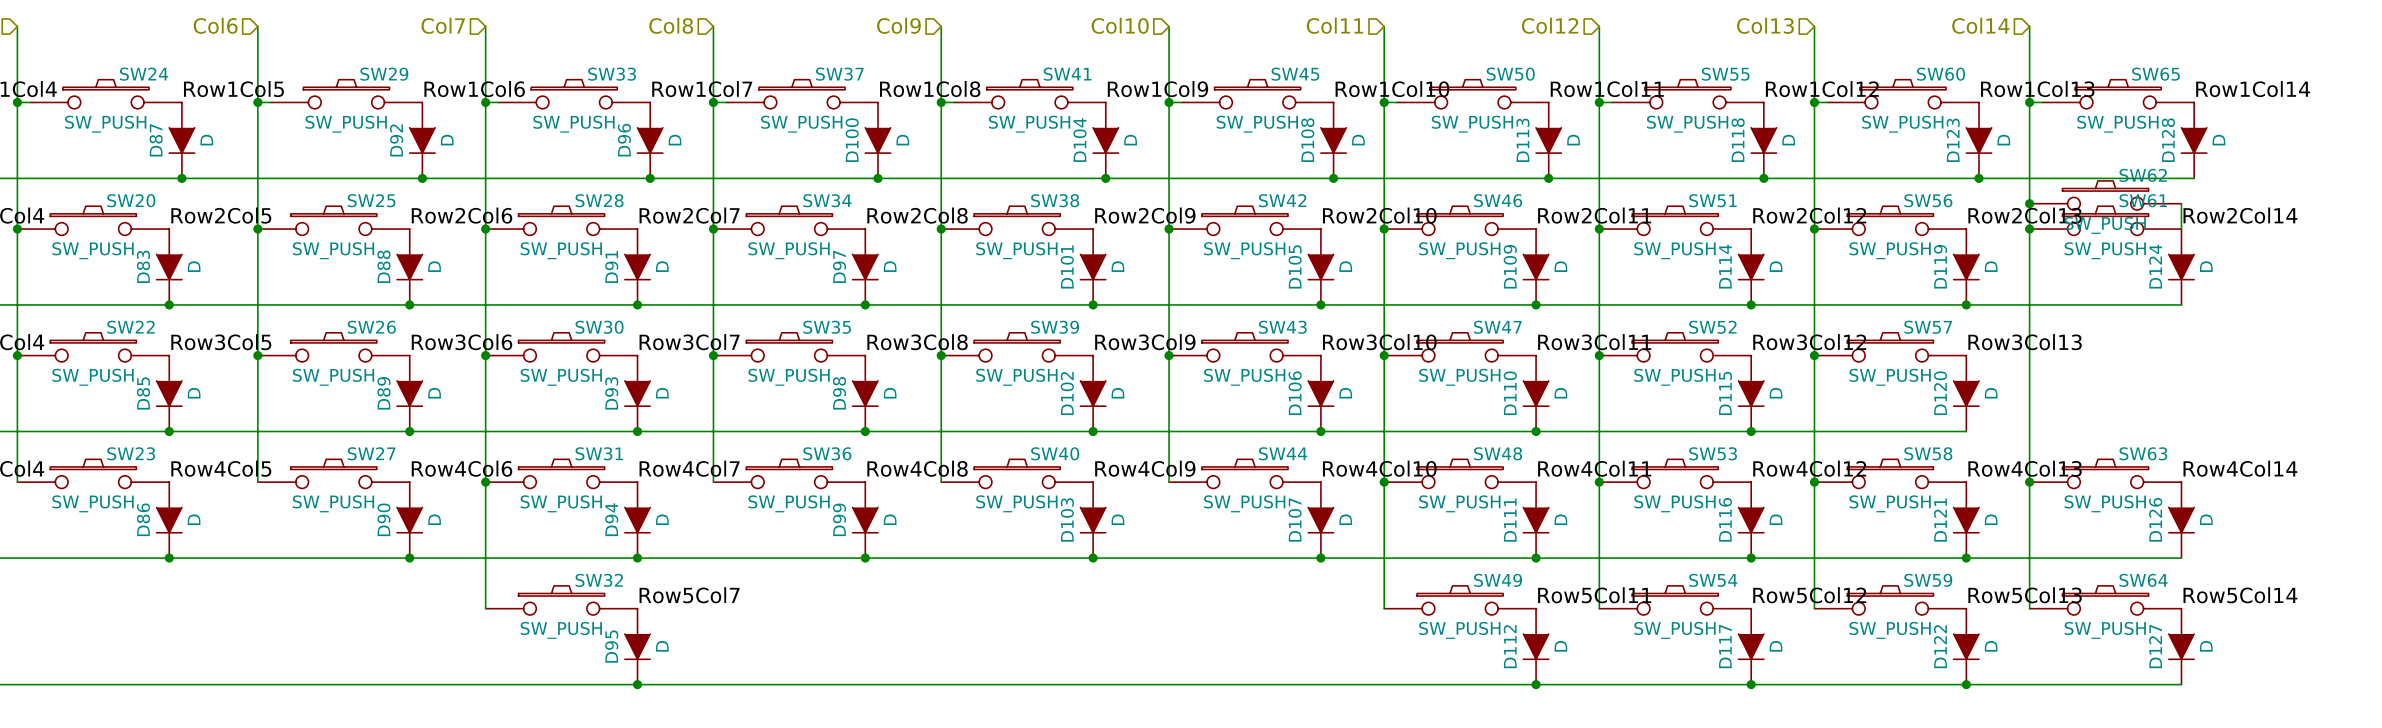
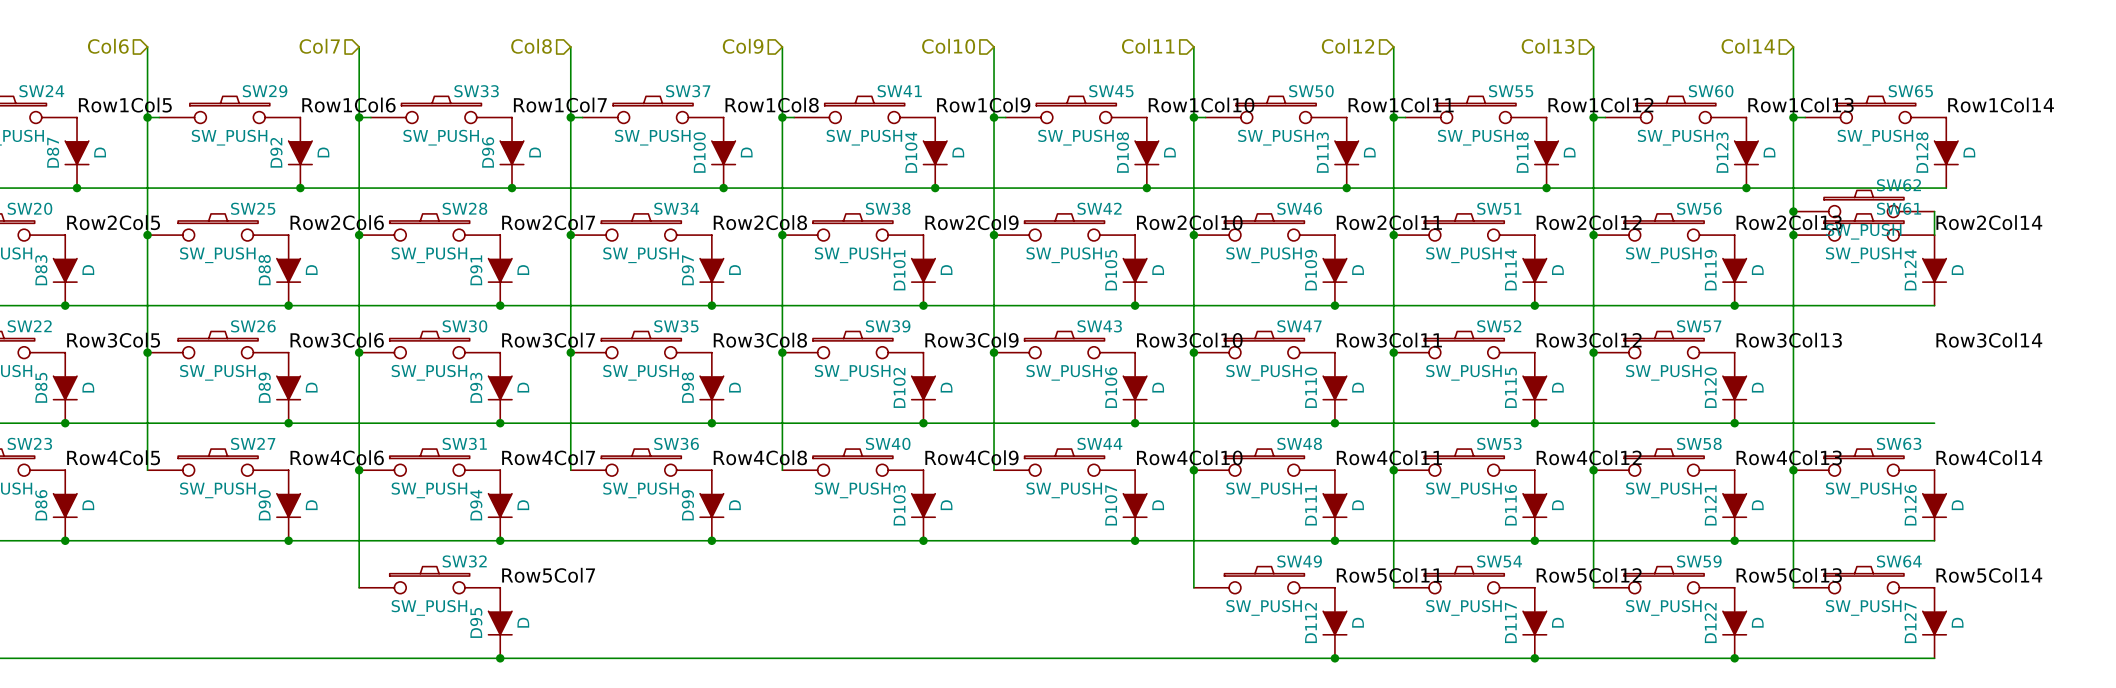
label: none -> Row3Col14 (1989, 340)
wire: none -> (1734, 423) (1934, 423)
junction: none -> (1734, 423)

